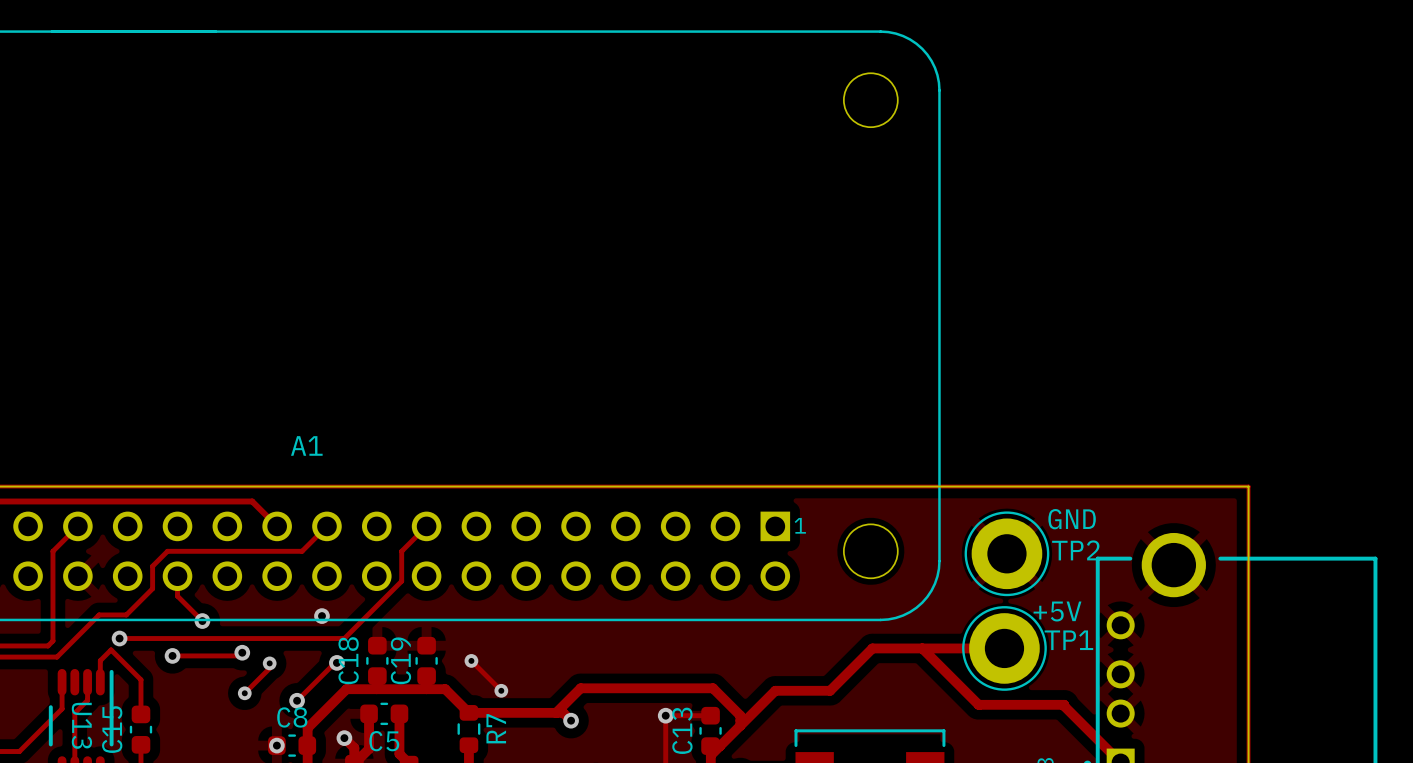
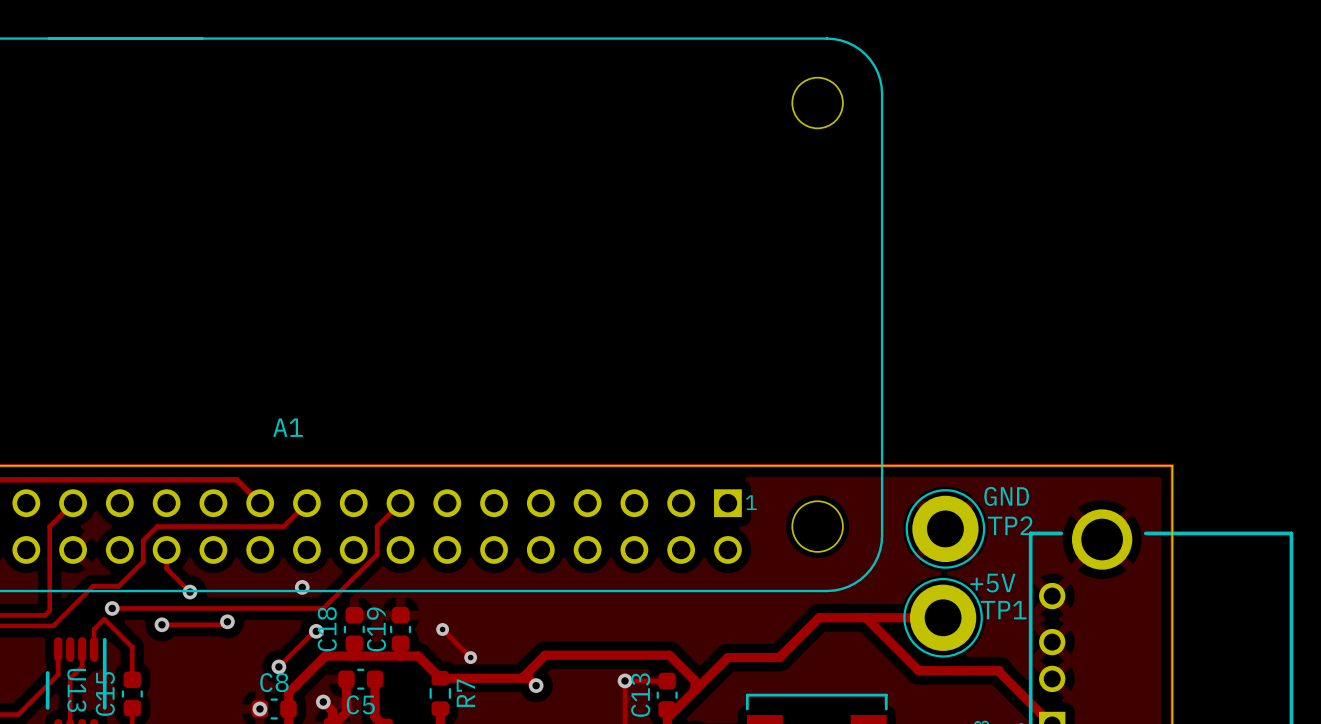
track: (269, 663) (269, 668) (244, 693) -> none
via: (269, 663) -> none
via: (244, 693) -> none

